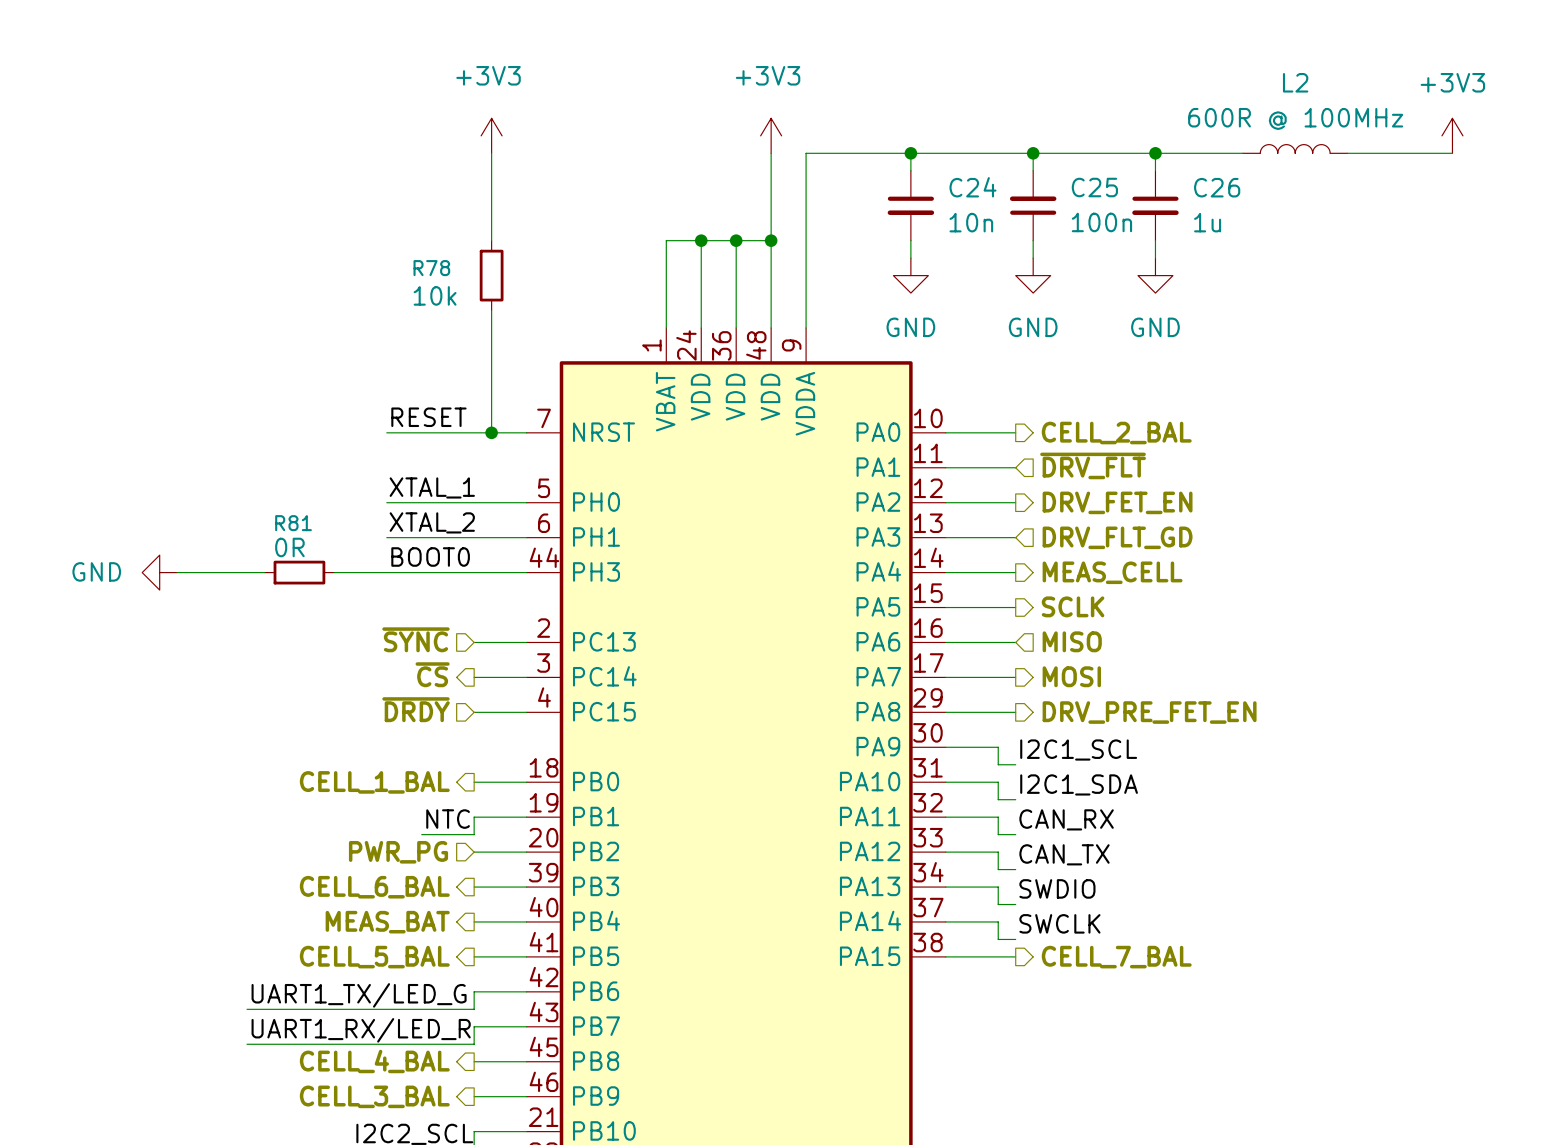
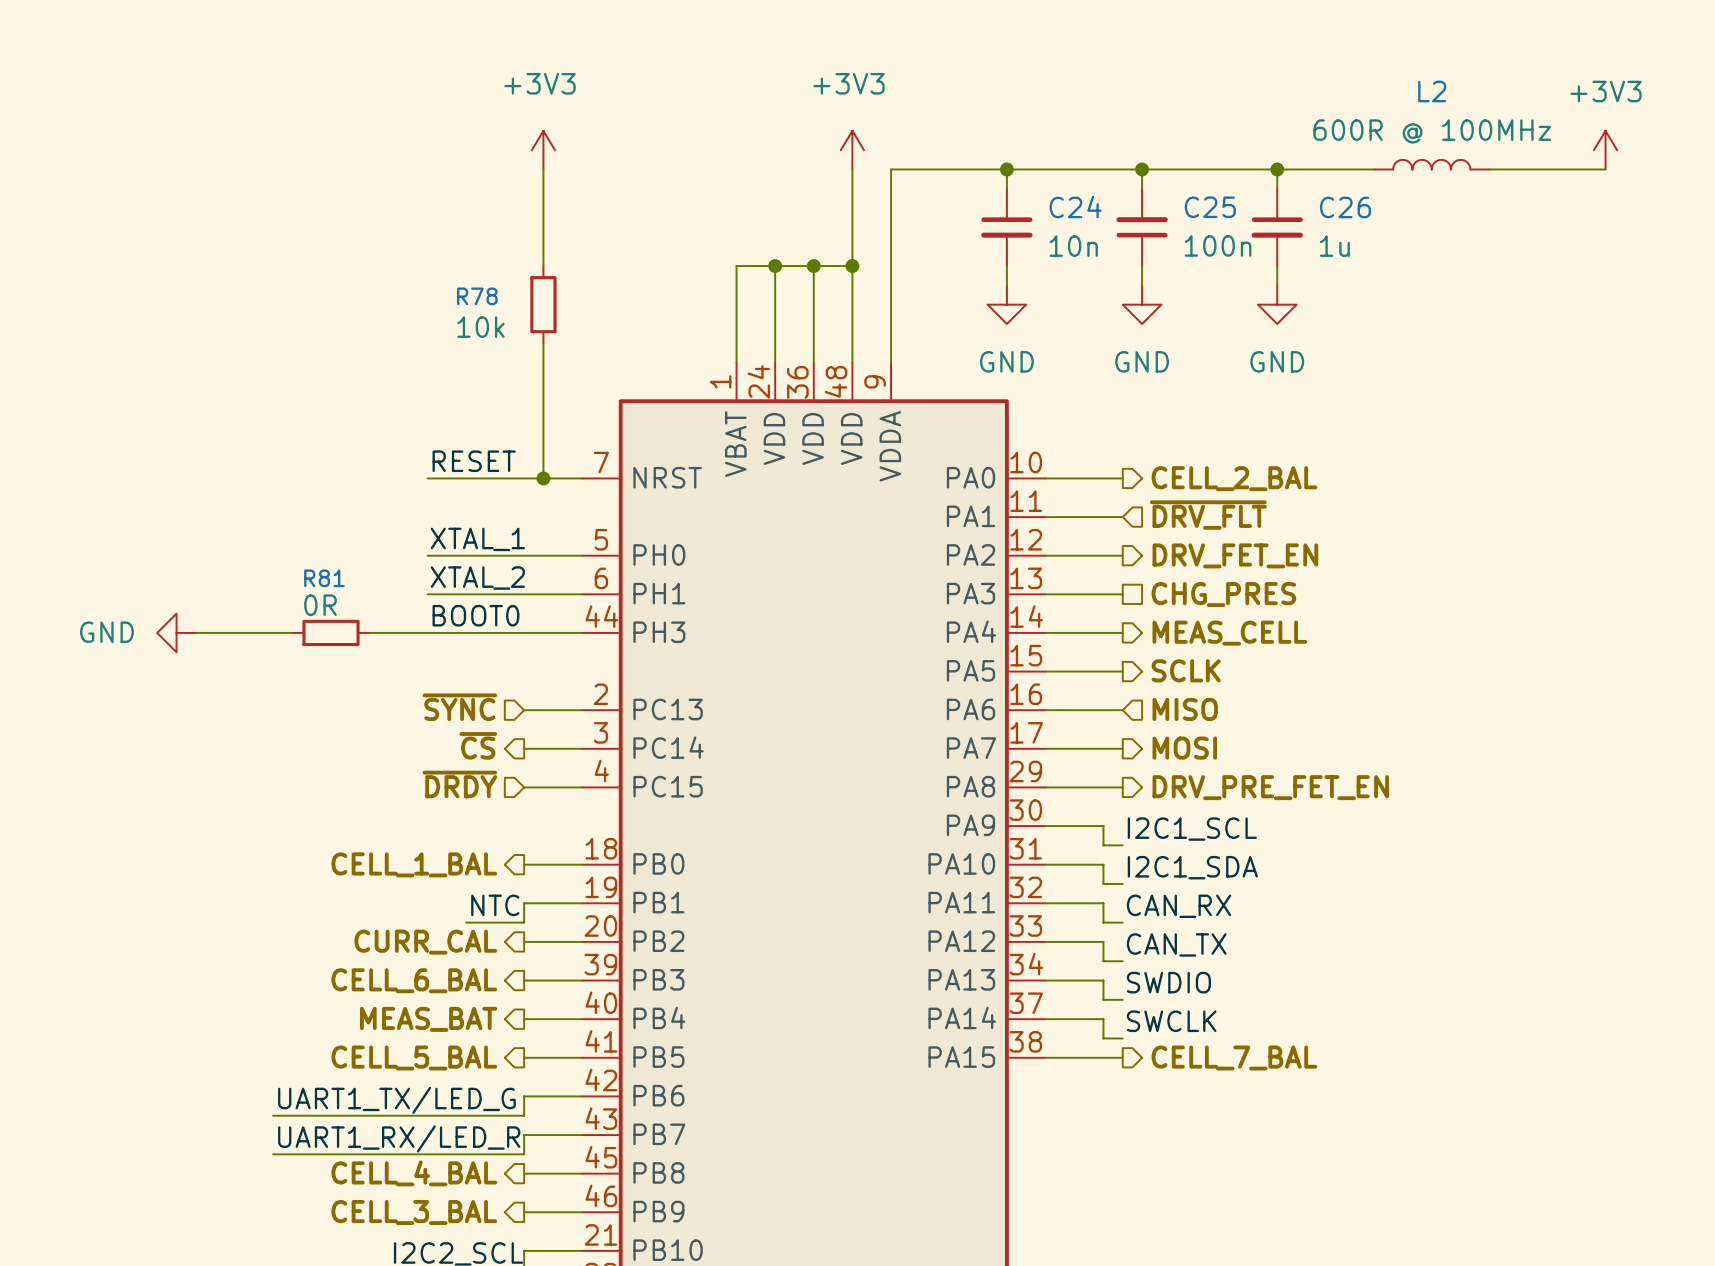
hierarchical label shape: input (1117, 537) -> passive (1223, 594)
hierarchical label: DRV_FLT_GD (1117, 537) -> CHG_PRES (1223, 594)
hierarchical label shape: input (398, 852) -> output (425, 942)
hierarchical label: PWR_PG (398, 852) -> CURR_CAL (425, 942)

